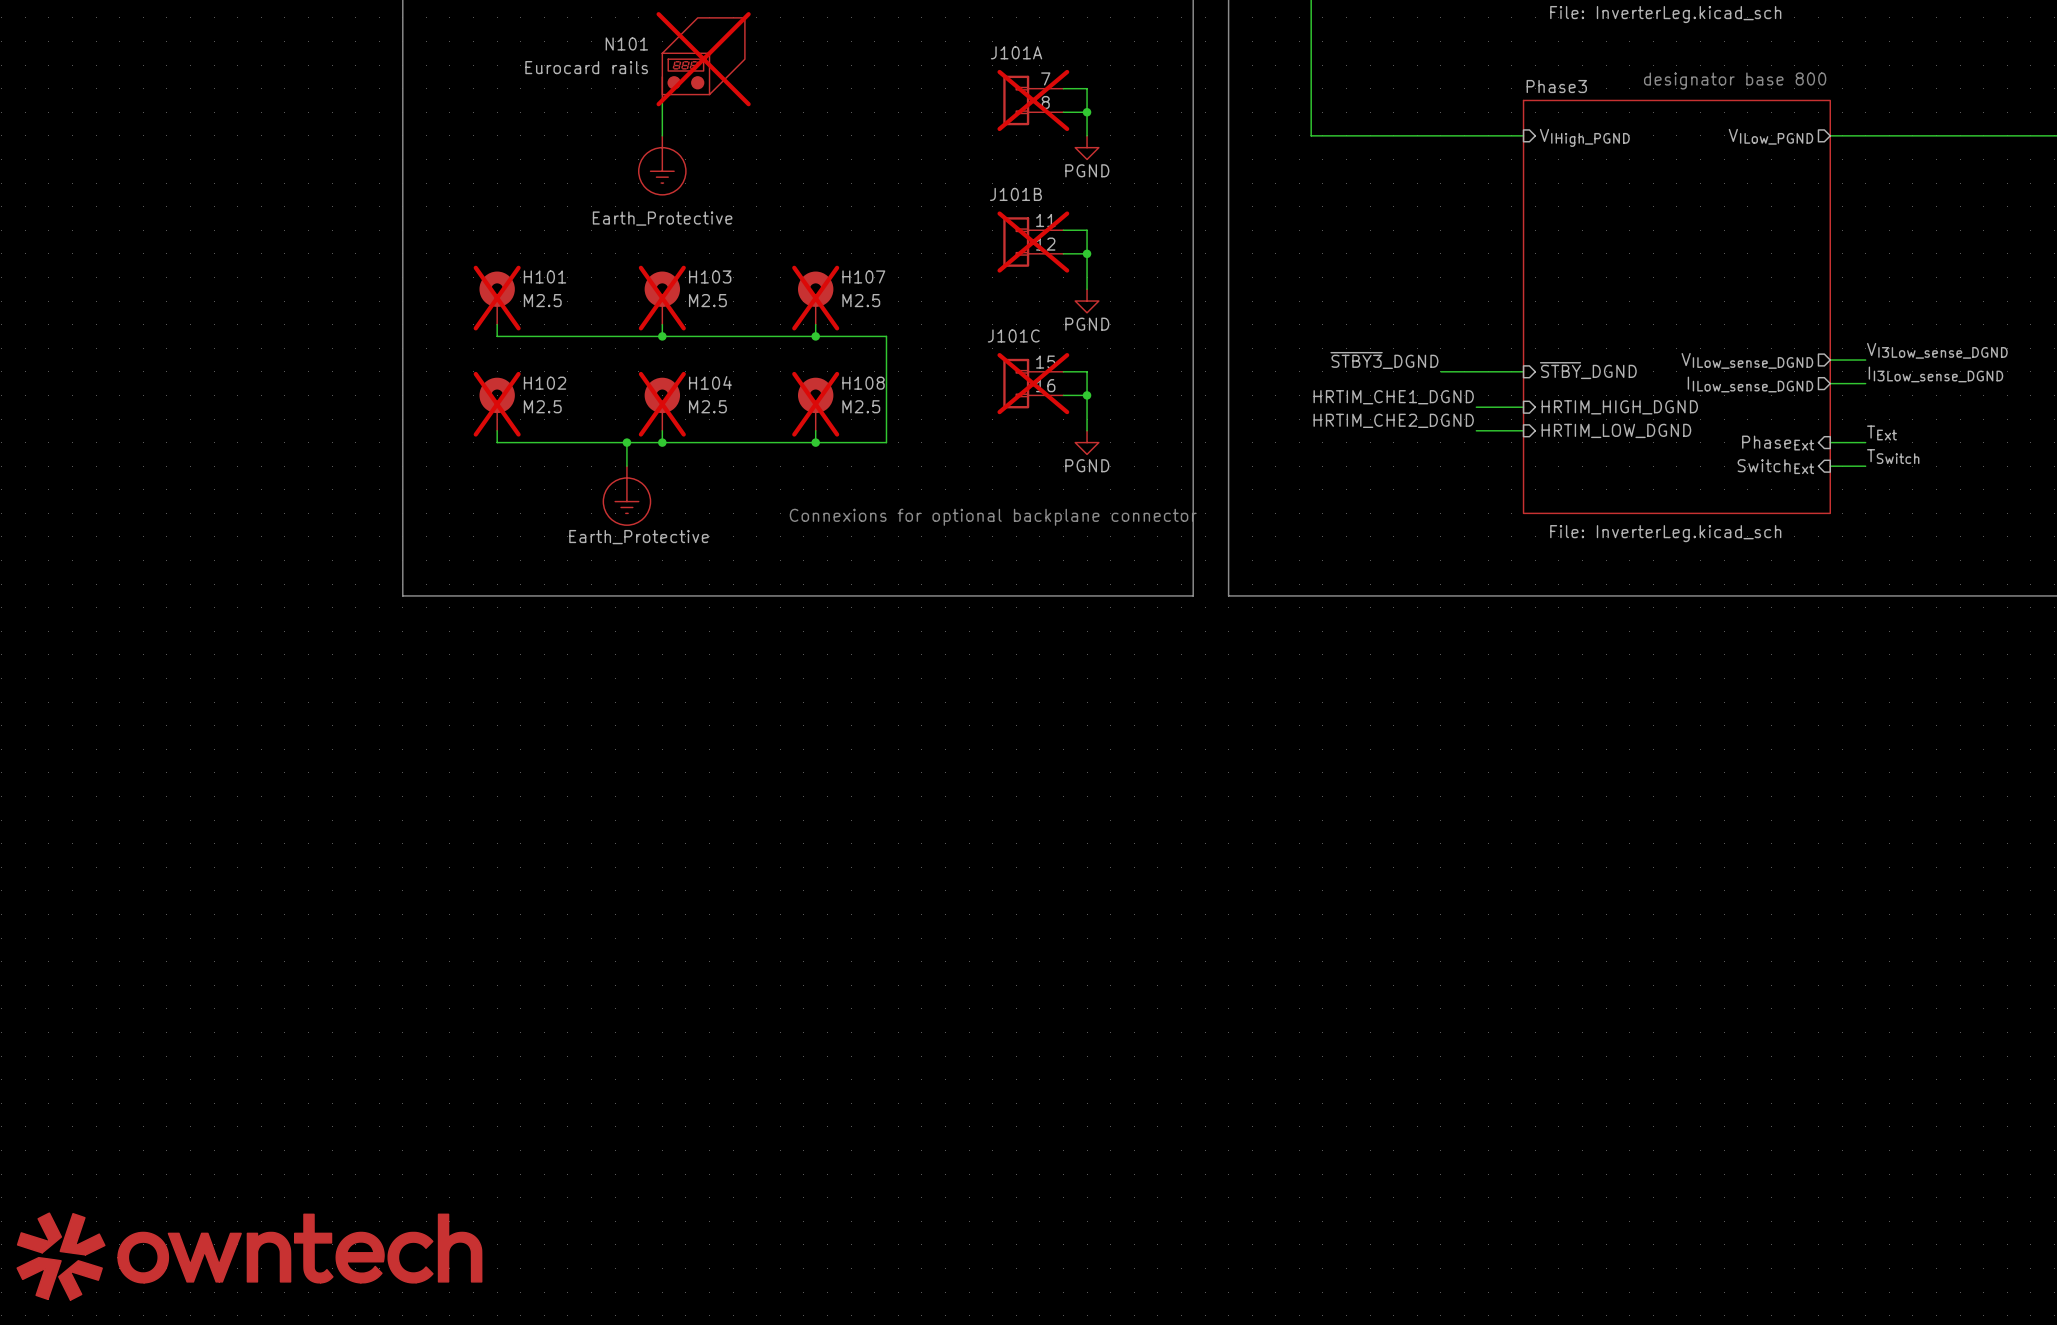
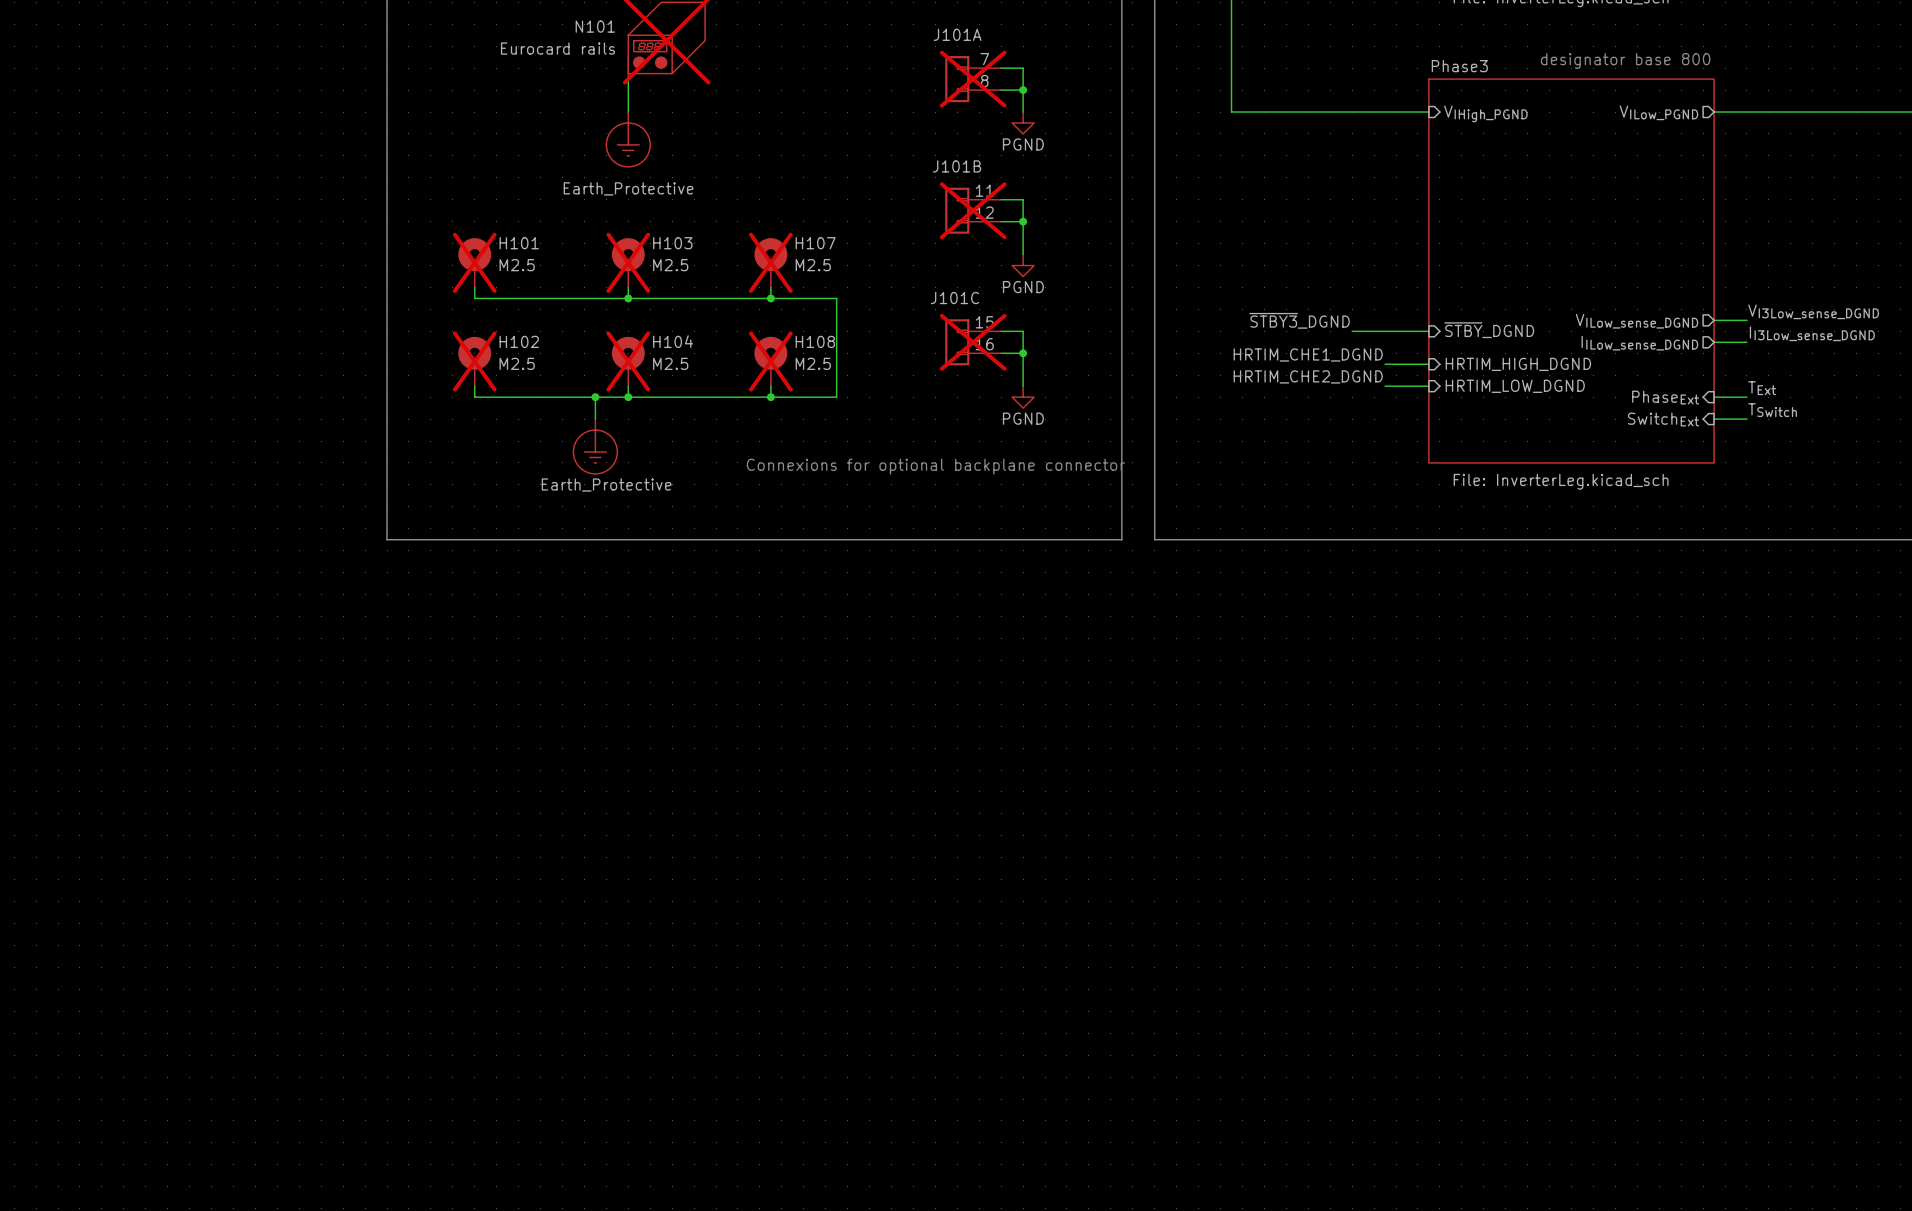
power symbol: (249, 1256) -> none

